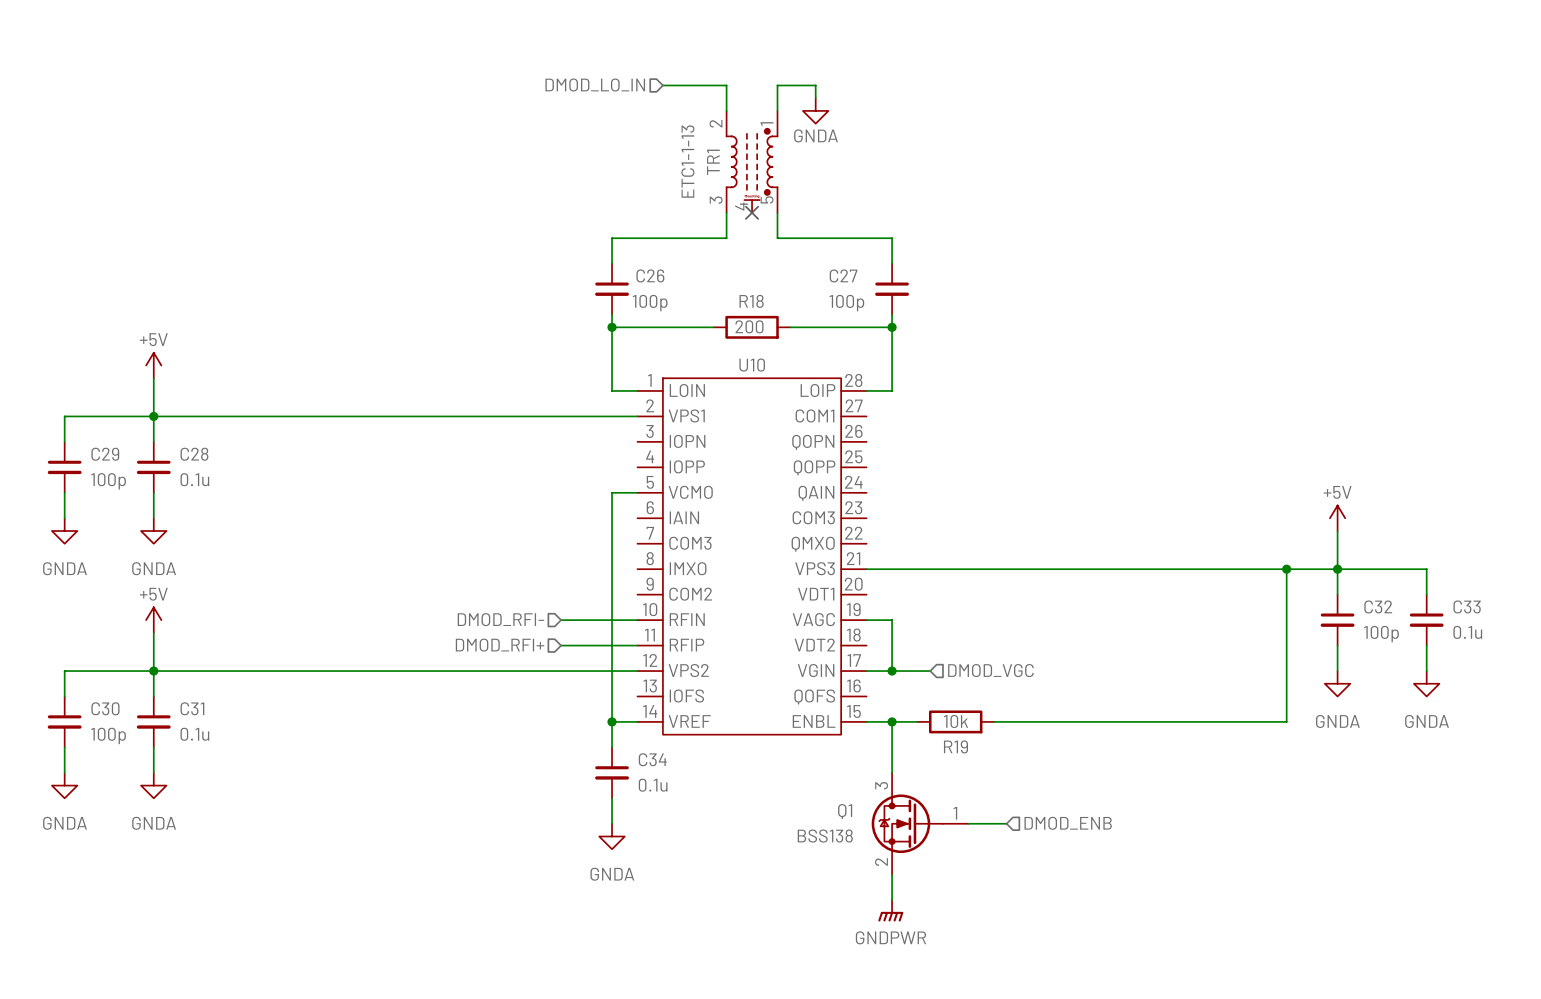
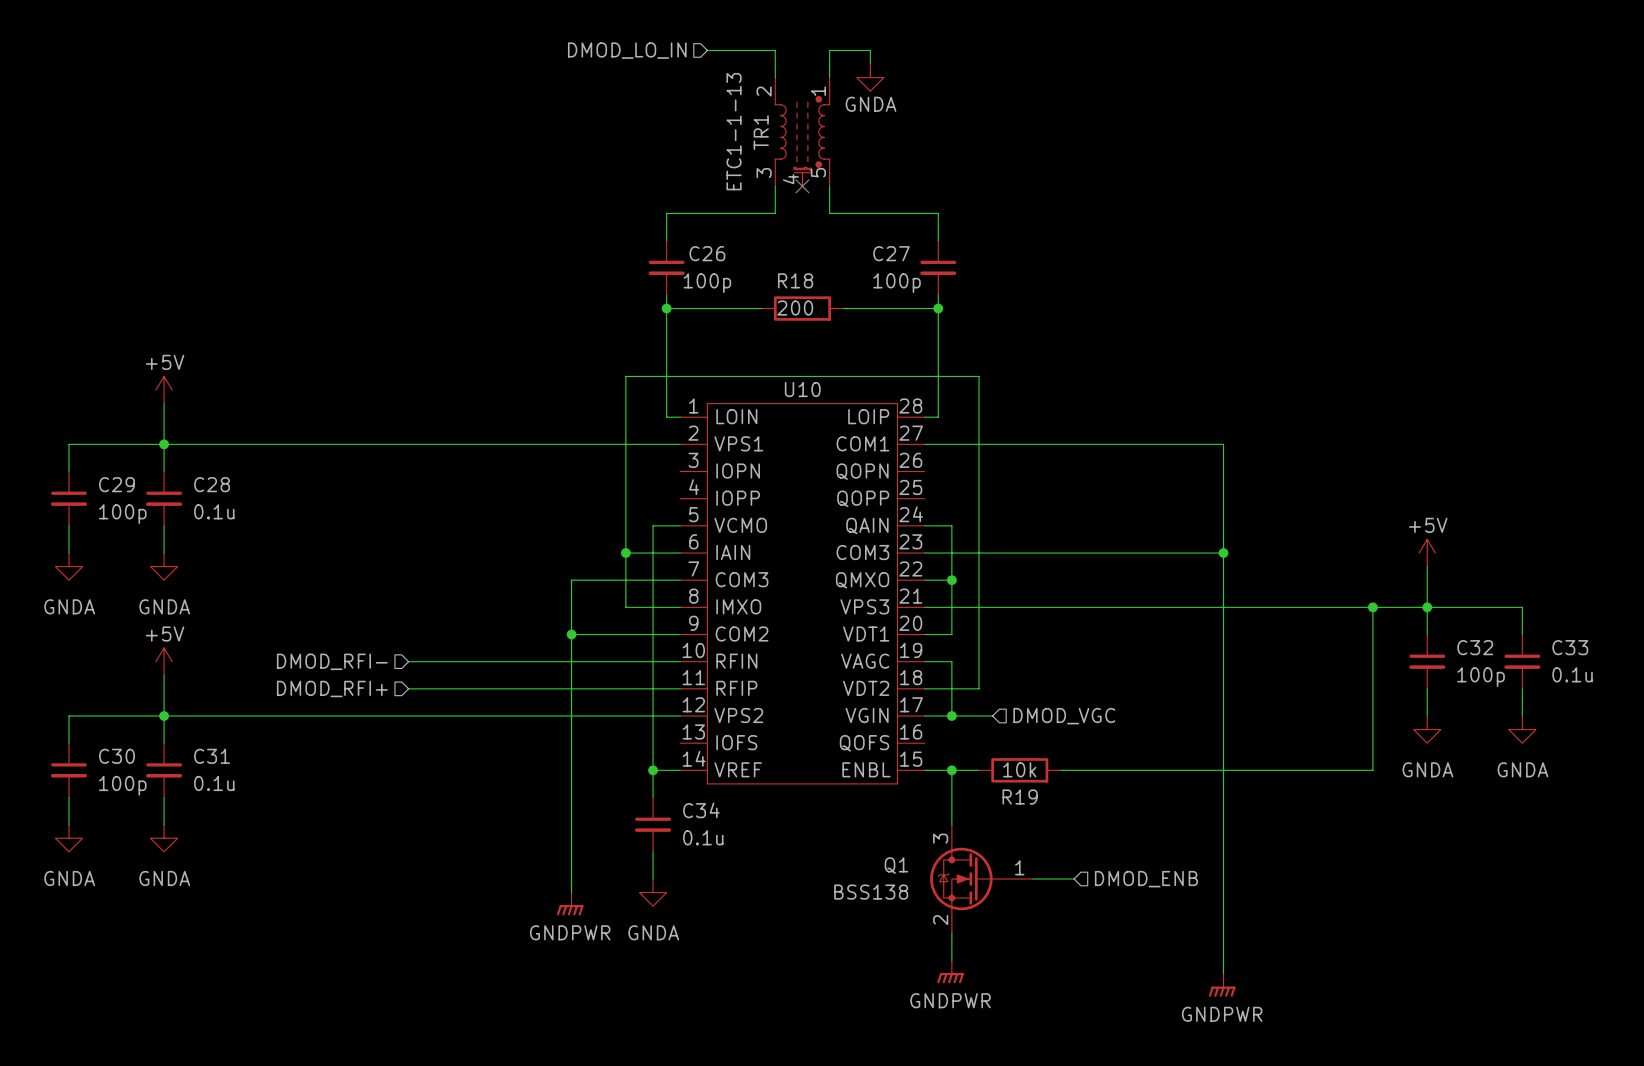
hierarchical label position: DMOD_LO_IN (595, 85) -> DMOD_LO_IN (627, 50)
wire: (662, 85) (726, 85) (726, 110) -> (707, 50) (775, 50) (775, 77)
wire: (815, 98) (815, 85) (777, 85) (777, 110) -> (870, 64) (870, 50) (829, 50) (829, 77)
power symbol position: GNDA (815, 110) -> GNDA (870, 77)
TR1 position: (752, 161) -> (802, 131)
wire: none -> (775, 186) (775, 213) (666, 213) (666, 240)
wire: none -> (829, 186) (829, 213) (938, 213) (938, 240)
wire: (726, 212) (726, 238) (612, 238) (612, 263) -> none
no-connect mark position: (752, 212) -> (802, 186)
wire: (777, 212) (777, 238) (892, 238) (892, 263) -> none
C26 position: (612, 289) -> (666, 267)
wire: none -> (666, 308) (761, 308)
wire: none -> (843, 308) (938, 308)
C27 position: (892, 289) -> (938, 267)
wire: (612, 314) (612, 390) (624, 390) -> (666, 294) (666, 417)
wire: (892, 314) (892, 390) (879, 390) -> (938, 294) (938, 417)
wire: (612, 327) (713, 327) -> none
junction position: (612, 327) -> (666, 308)
R18 position: (752, 327) -> (802, 308)
wire: (790, 327) (892, 327) -> none
junction position: (892, 327) -> (938, 308)
wire: none -> (924, 444) (1223, 444) (1223, 974)
wire: none -> (924, 525) (951, 525) (951, 634) (924, 634)
wire: none -> (625, 553) (680, 553)
junction: none -> (625, 553)
wire: none -> (924, 553) (1223, 553)
junction: none -> (1223, 553)
wire: none -> (680, 580) (571, 580) (571, 892)
wire: none -> (924, 580) (951, 580)
junction: none -> (951, 580)
wire: none -> (680, 607) (625, 607) (625, 376) (979, 376) (979, 688) (924, 688)
wire: none -> (571, 634) (680, 634)
junction: none -> (571, 634)
hierarchical label position: DMOD_RFI- (500, 619) -> DMOD_RFI- (332, 661)
wire: none -> (408, 661) (598, 661)
wire: none -> (408, 688) (598, 688)
hierarchical label position: DMOD_RFI+ (500, 645) -> DMOD_RFI+ (332, 688)
power symbol: none -> GNDPWR (570, 903)
power symbol: none -> GNDPWR (1222, 985)

